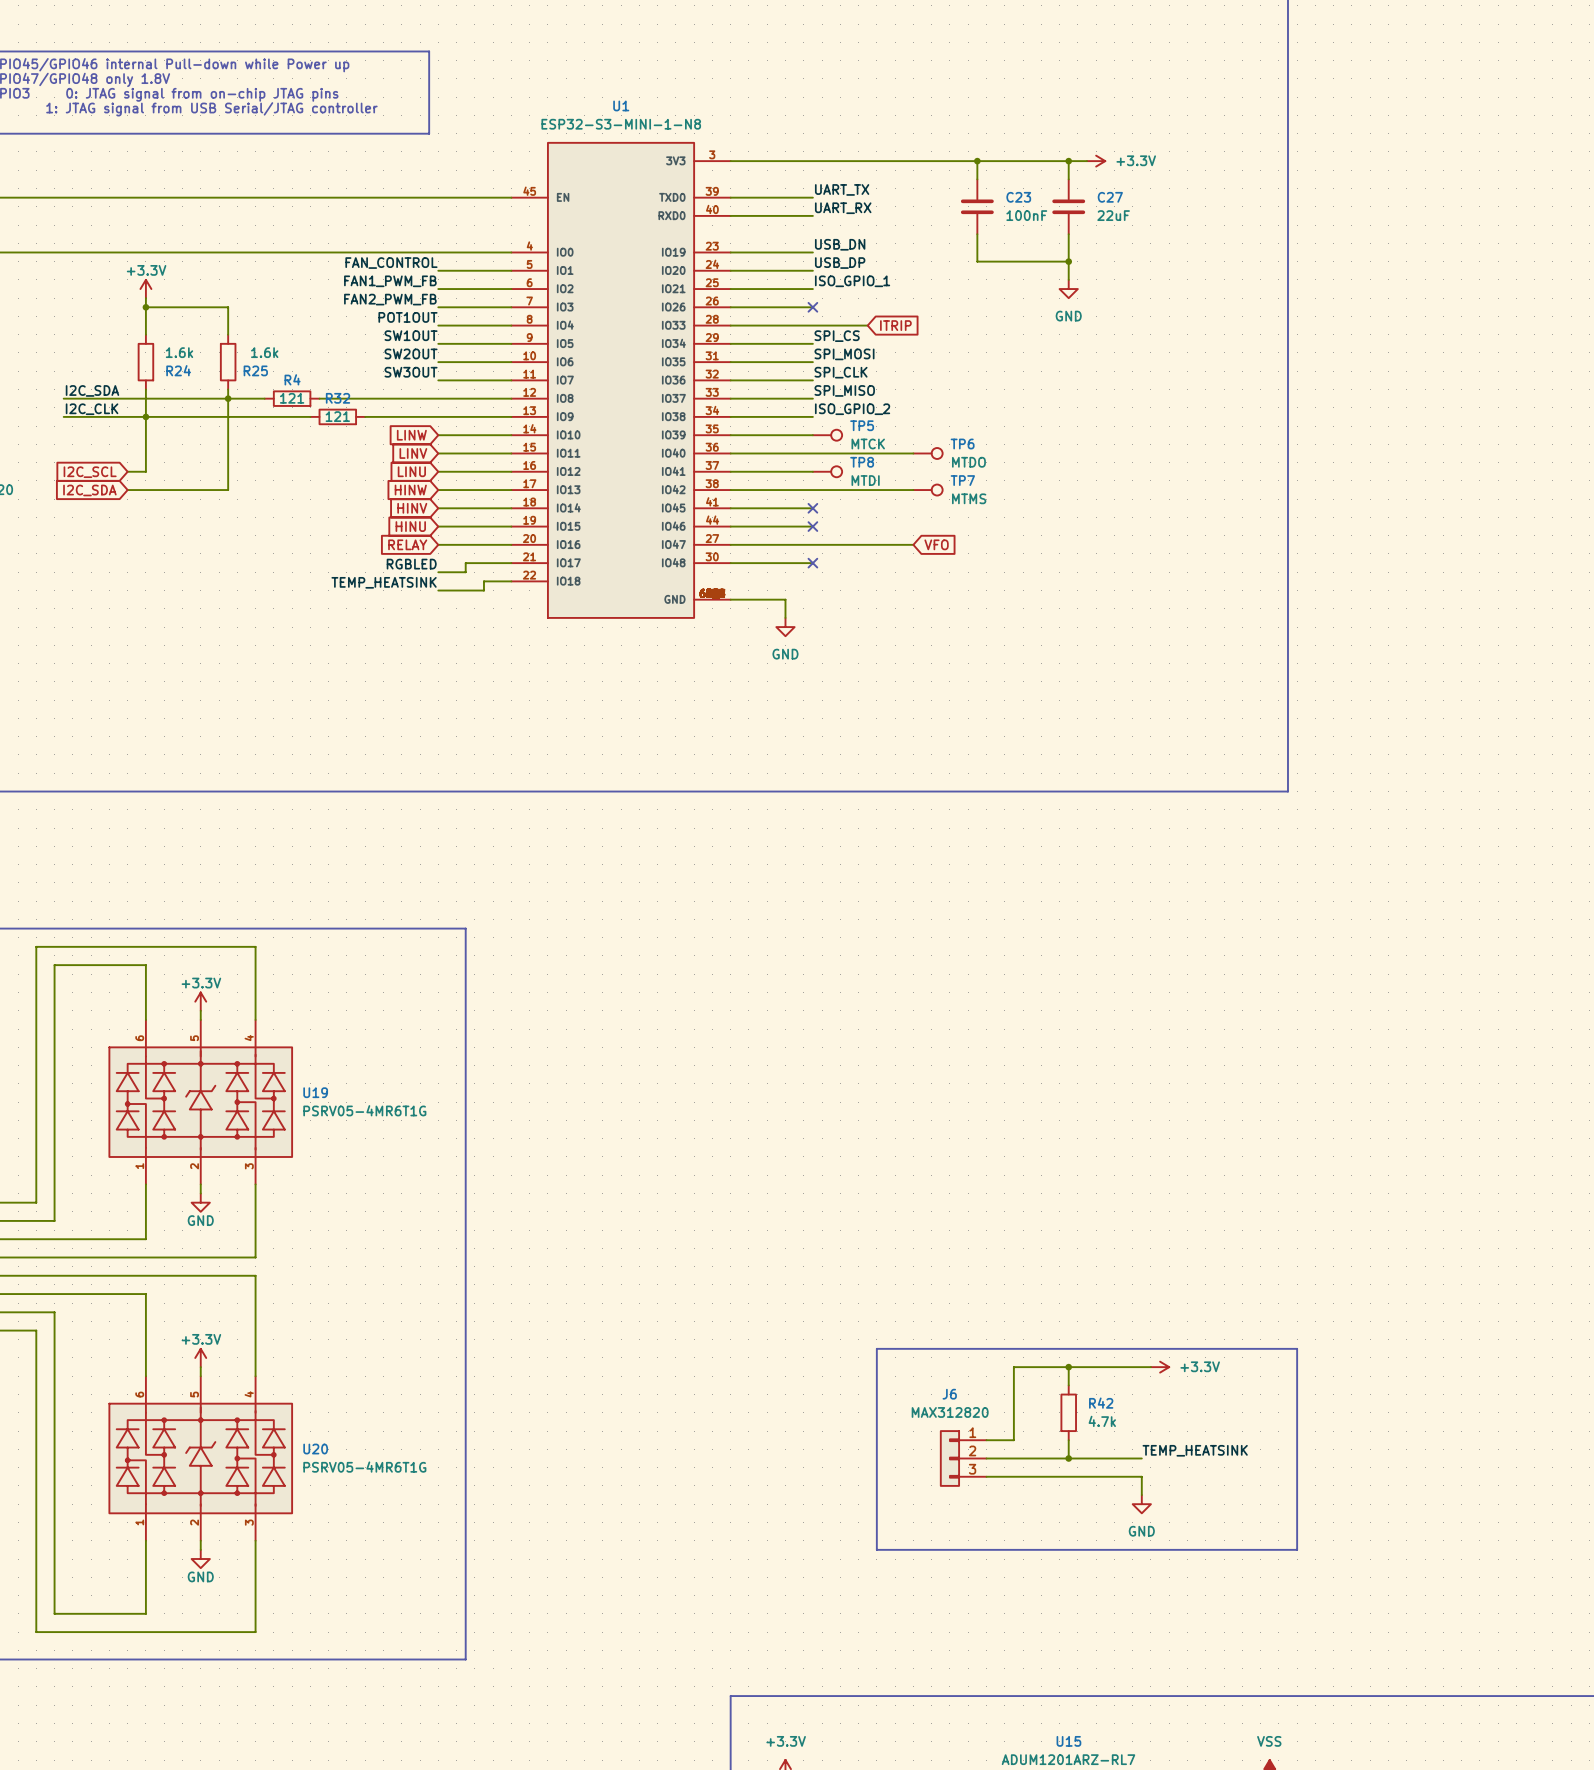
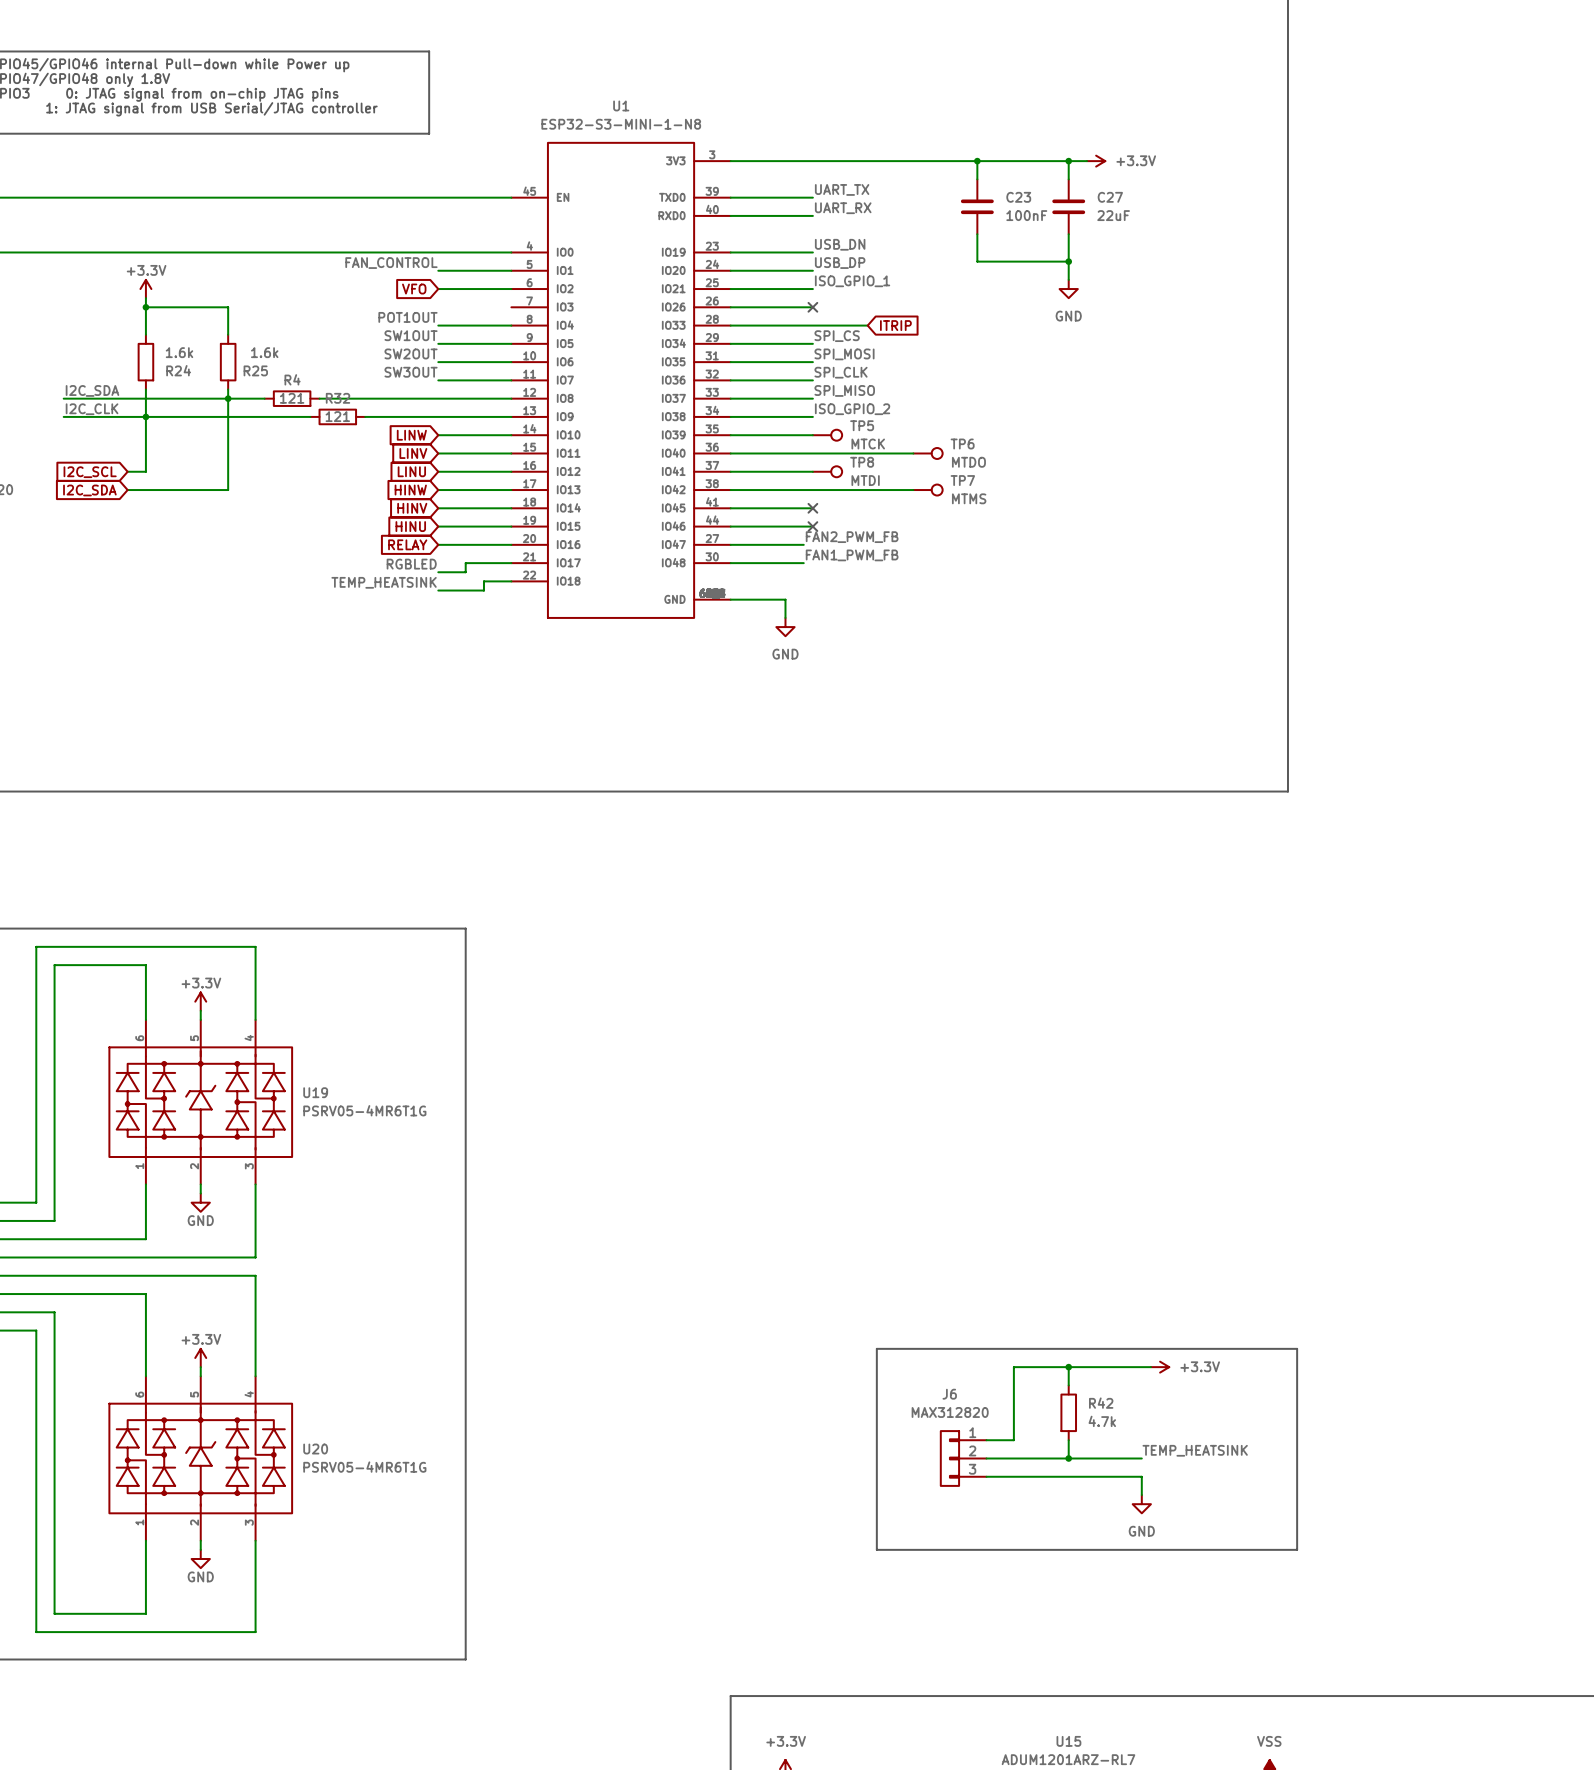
label: FAN1_PWM_FB (390, 281) -> none
global label: none -> VFO (414, 289)
label: FAN2_PWM_FB (390, 299) -> none
wire: (438, 307) (511, 307) -> none
label: none -> FAN2_PWM_FB (852, 537)
wire: (803, 544) (913, 544) -> none
global label: VFO (936, 544) -> none
label: none -> FAN1_PWM_FB (852, 555)
wire: (803, 563) (812, 563) -> none
no-connect mark: (812, 563) -> none

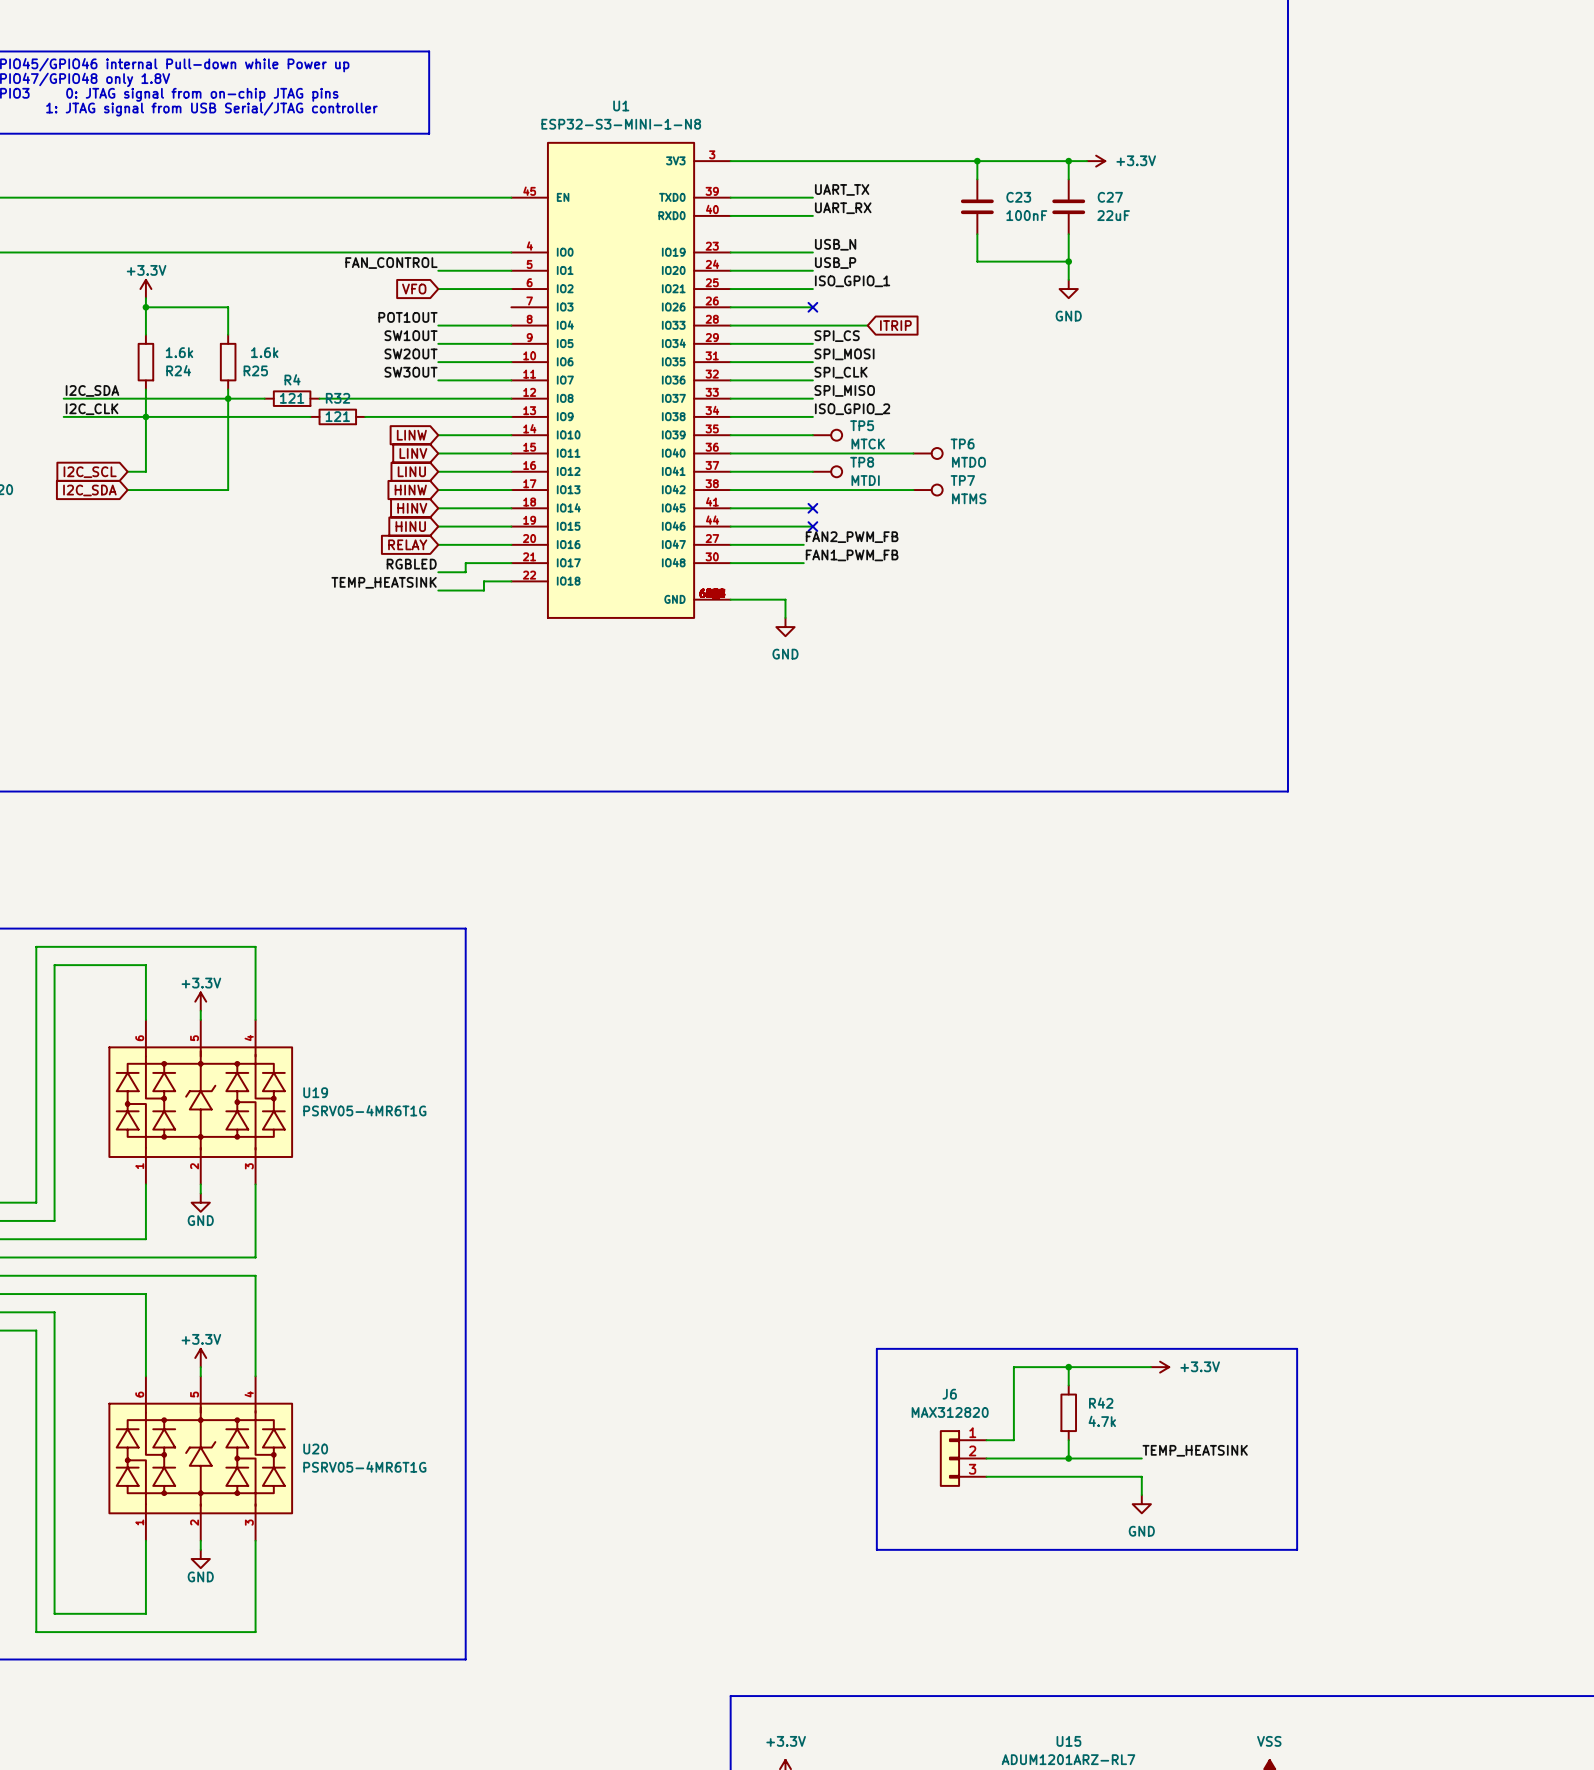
label: USB_DN (840, 244) -> USB_N (835, 244)
label: USB_DP (840, 263) -> USB_P (835, 263)

